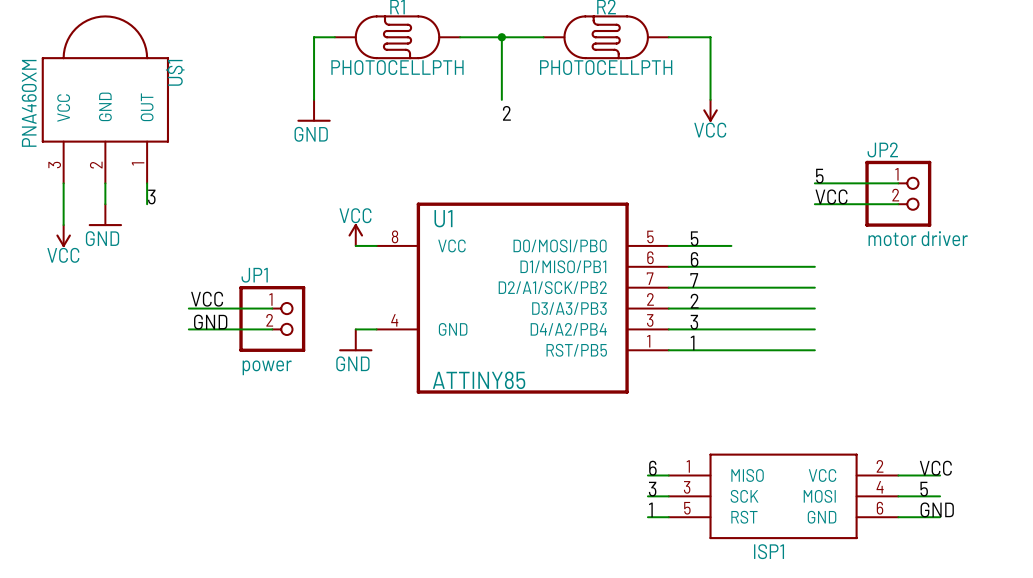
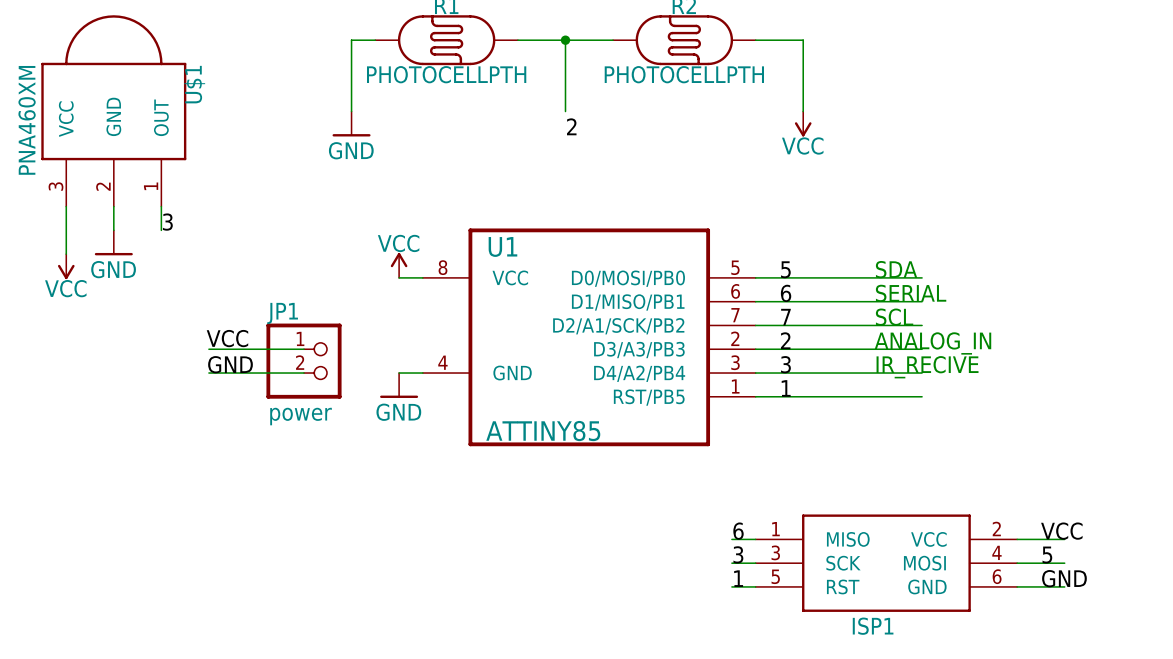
label: 5 (819, 176) -> none
wire: (814, 183) (898, 183) -> none
JP2: motor driver (898, 193) -> none
label: VCC (831, 196) -> none
wire: (814, 204) (898, 204) -> (826, 277) (922, 277)
text: none -> SDA (896, 269)
text: none -> SERIAL (911, 293)
text: none -> SCL (894, 317)
text: none -> ANALOG_IN (932, 343)
text: none -> IR_RECIVE (927, 367)

